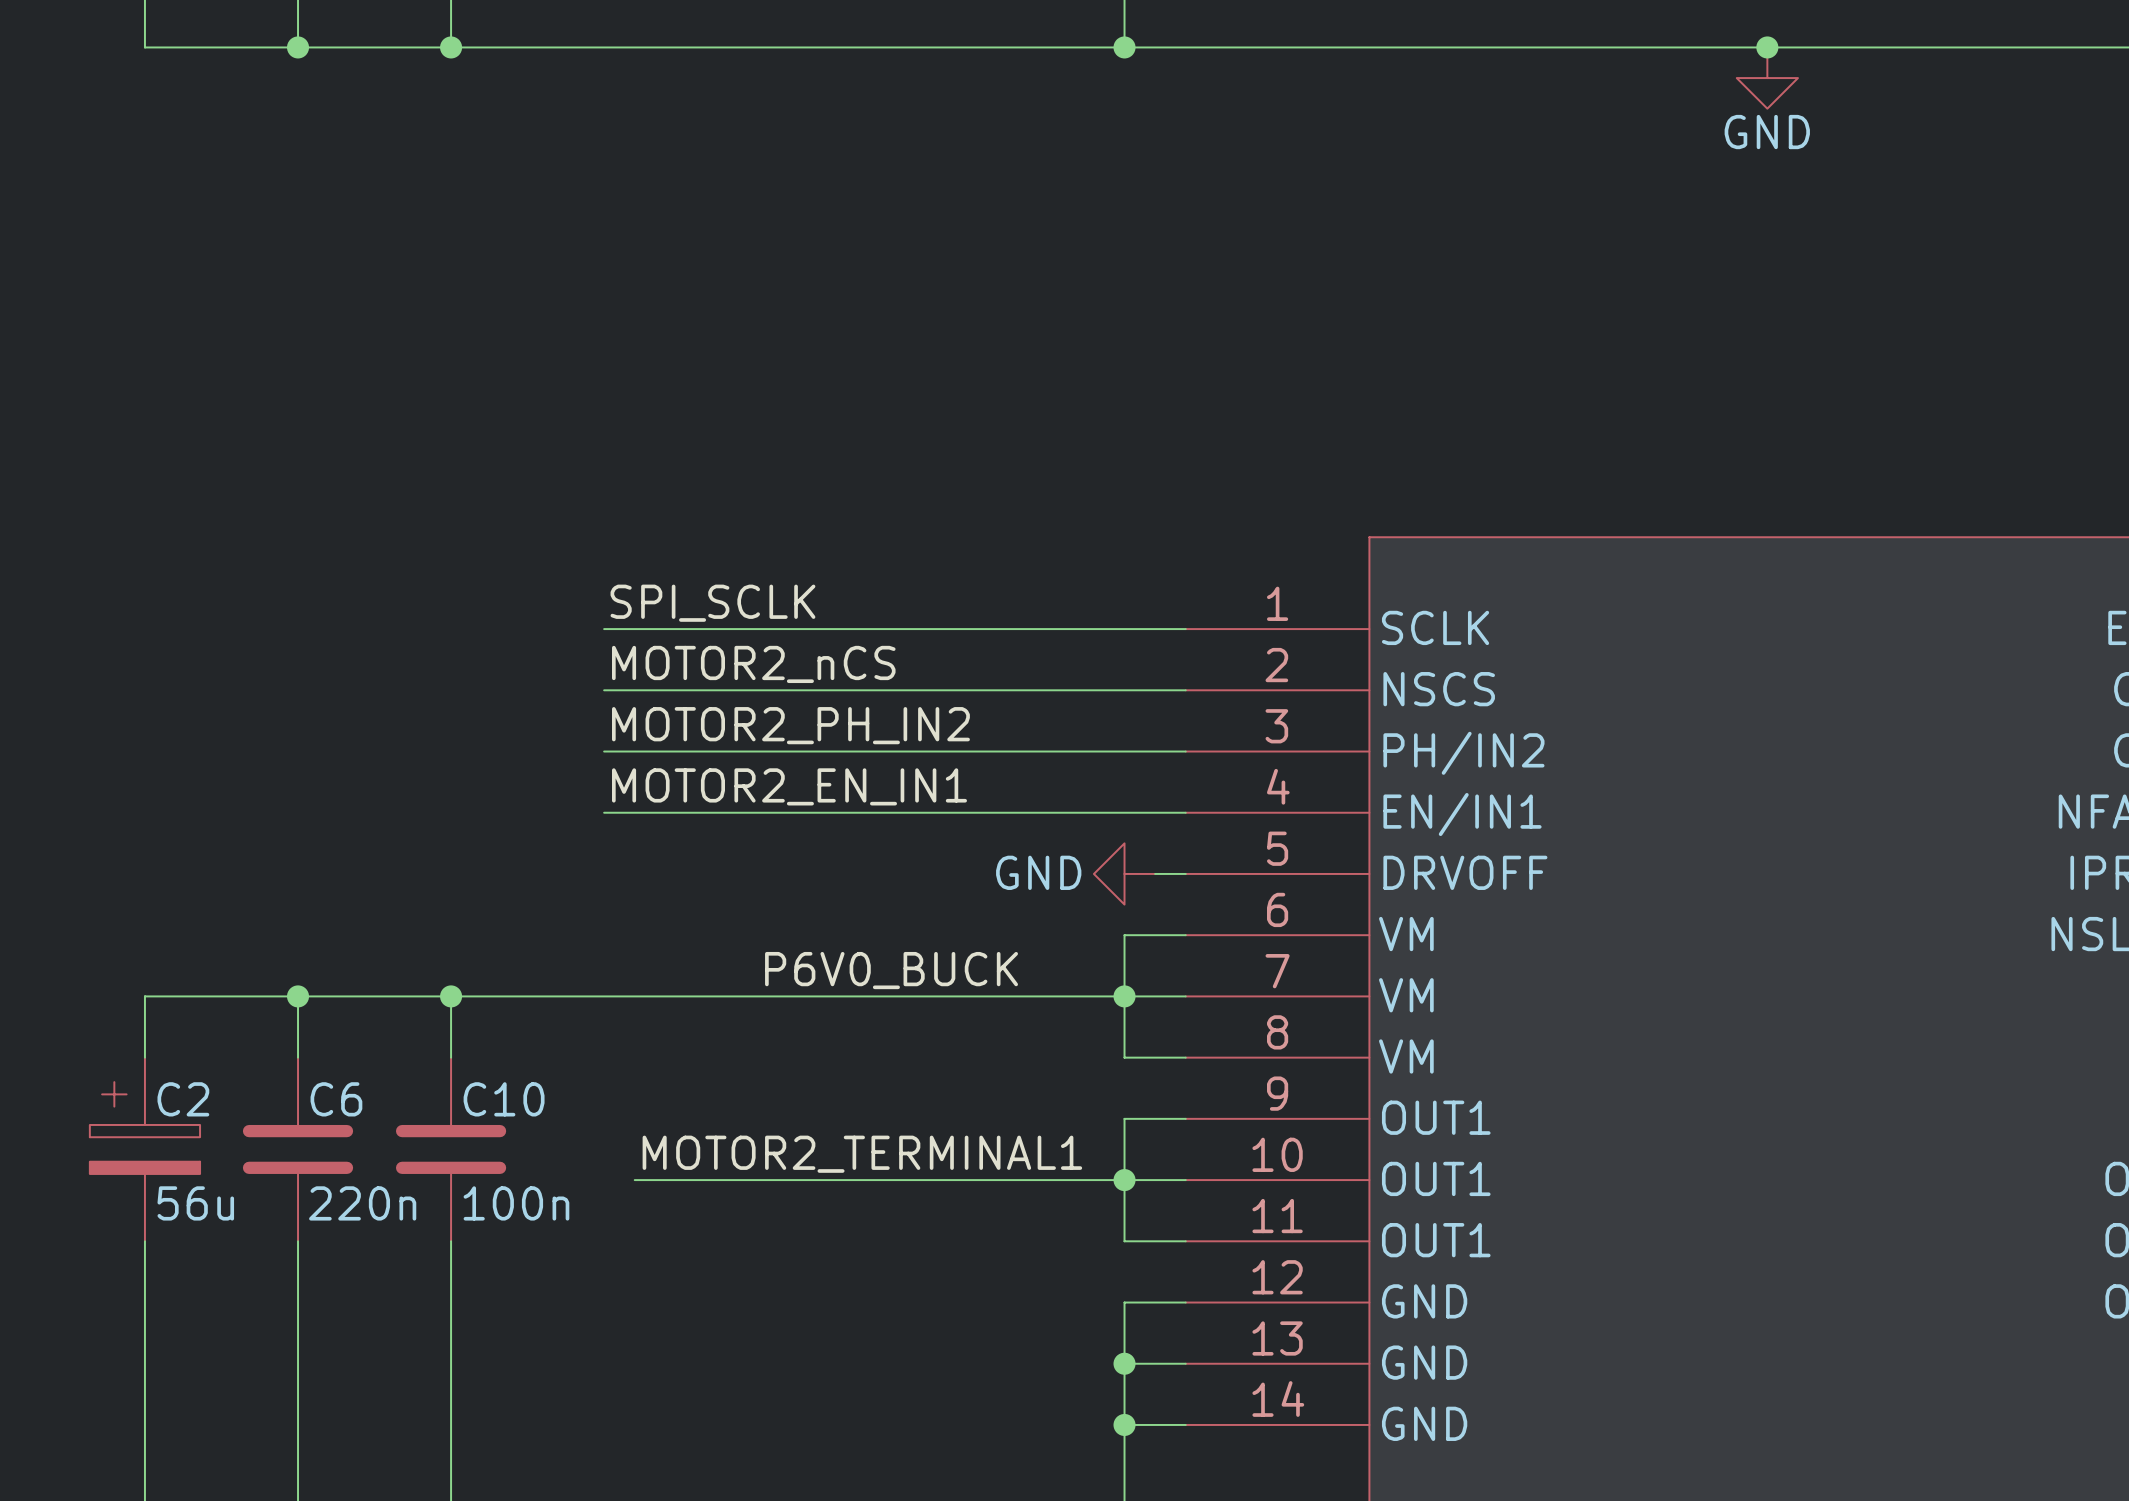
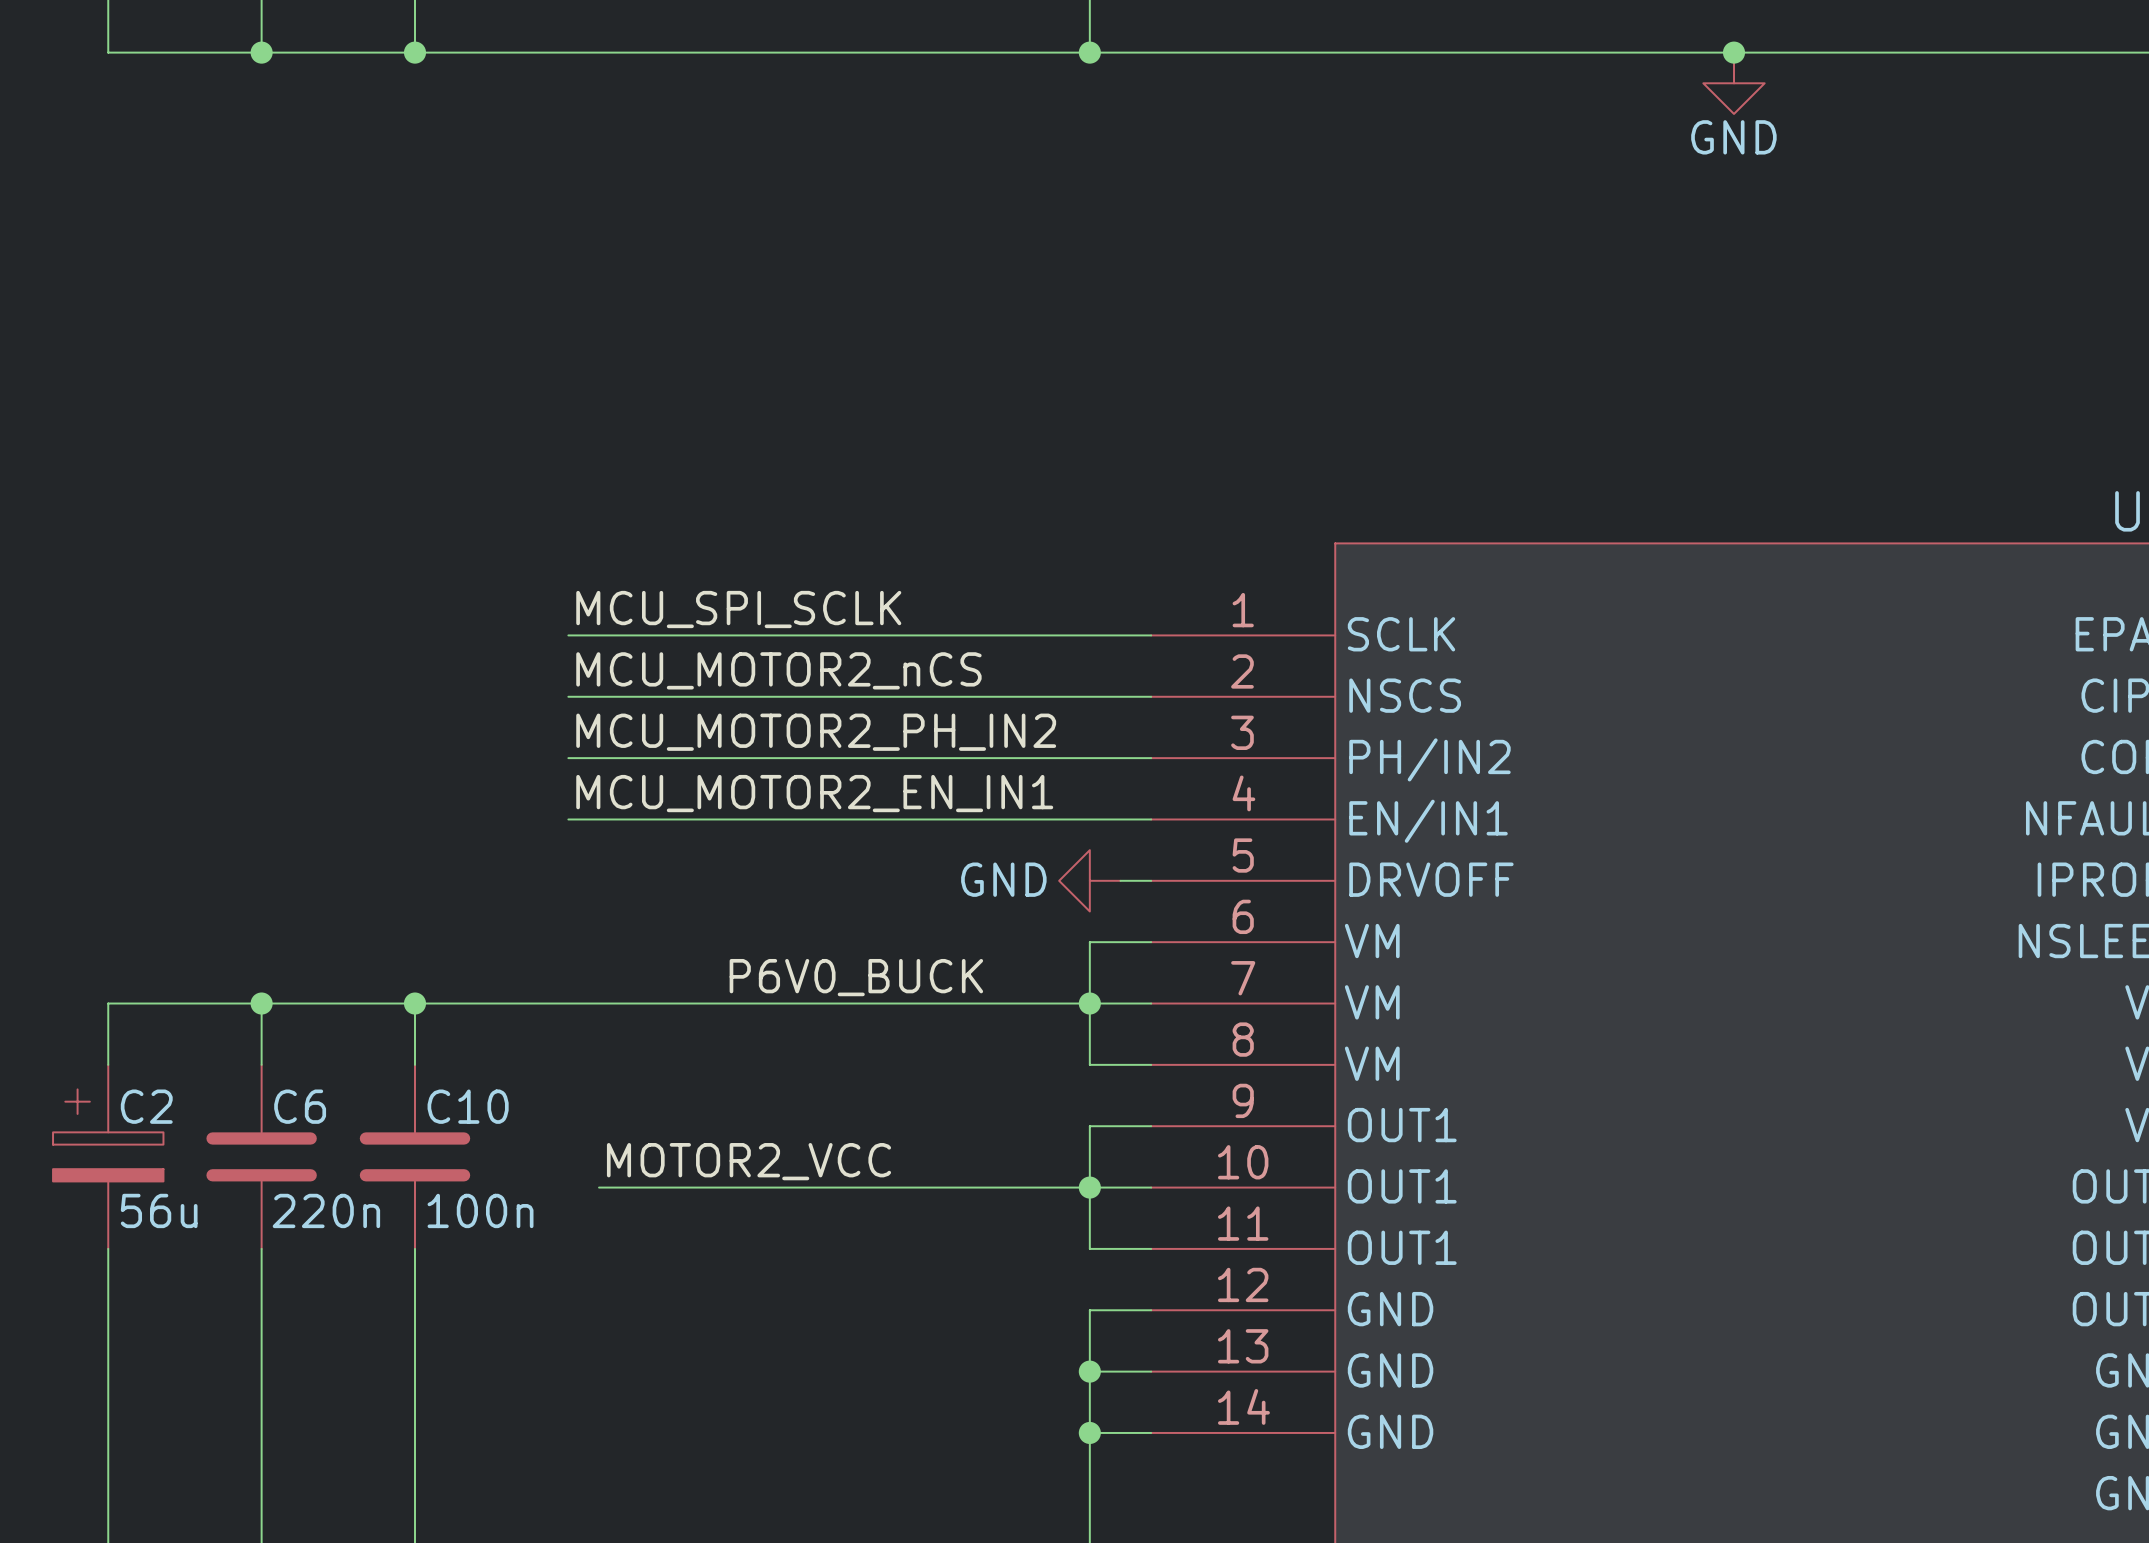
label: SPI_SCLK (712, 603) -> MCU_SPI_SCLK (738, 609)
label: MOTOR2_nCS (753, 664) -> MCU_MOTOR2_nCS (778, 670)
label: MOTOR2_PH_IN2 (790, 725) -> MCU_MOTOR2_PH_IN2 (816, 732)
label: MOTOR2_EN_IN1 (789, 786) -> MCU_MOTOR2_EN_IN1 (814, 793)
label: MOTOR2_TERMINAL1 (862, 1154) -> MOTOR2_VCC (748, 1161)

